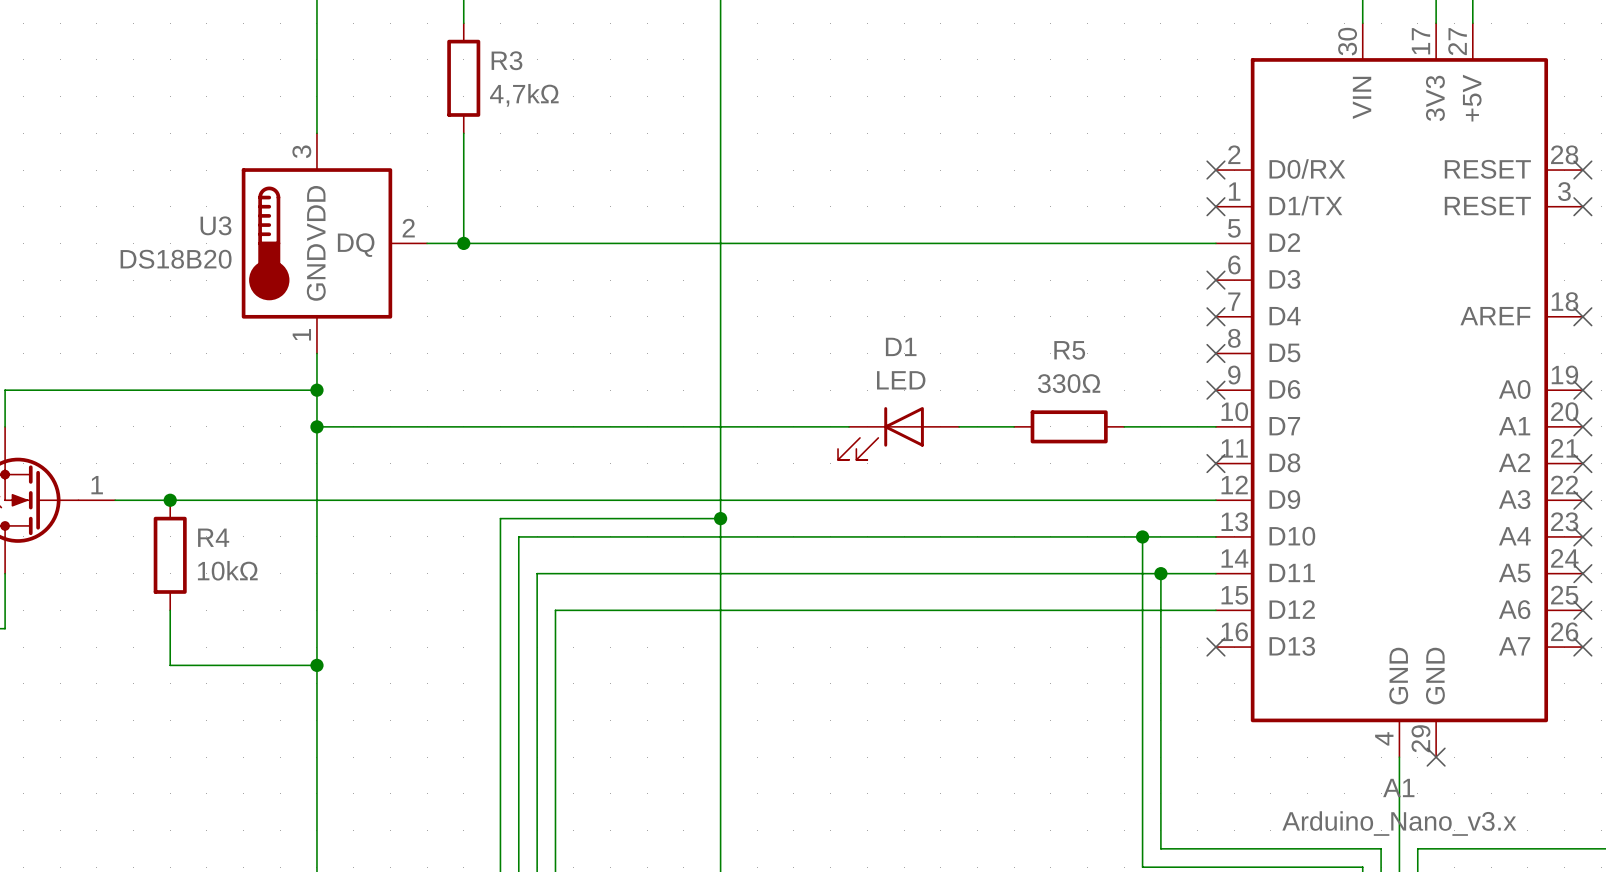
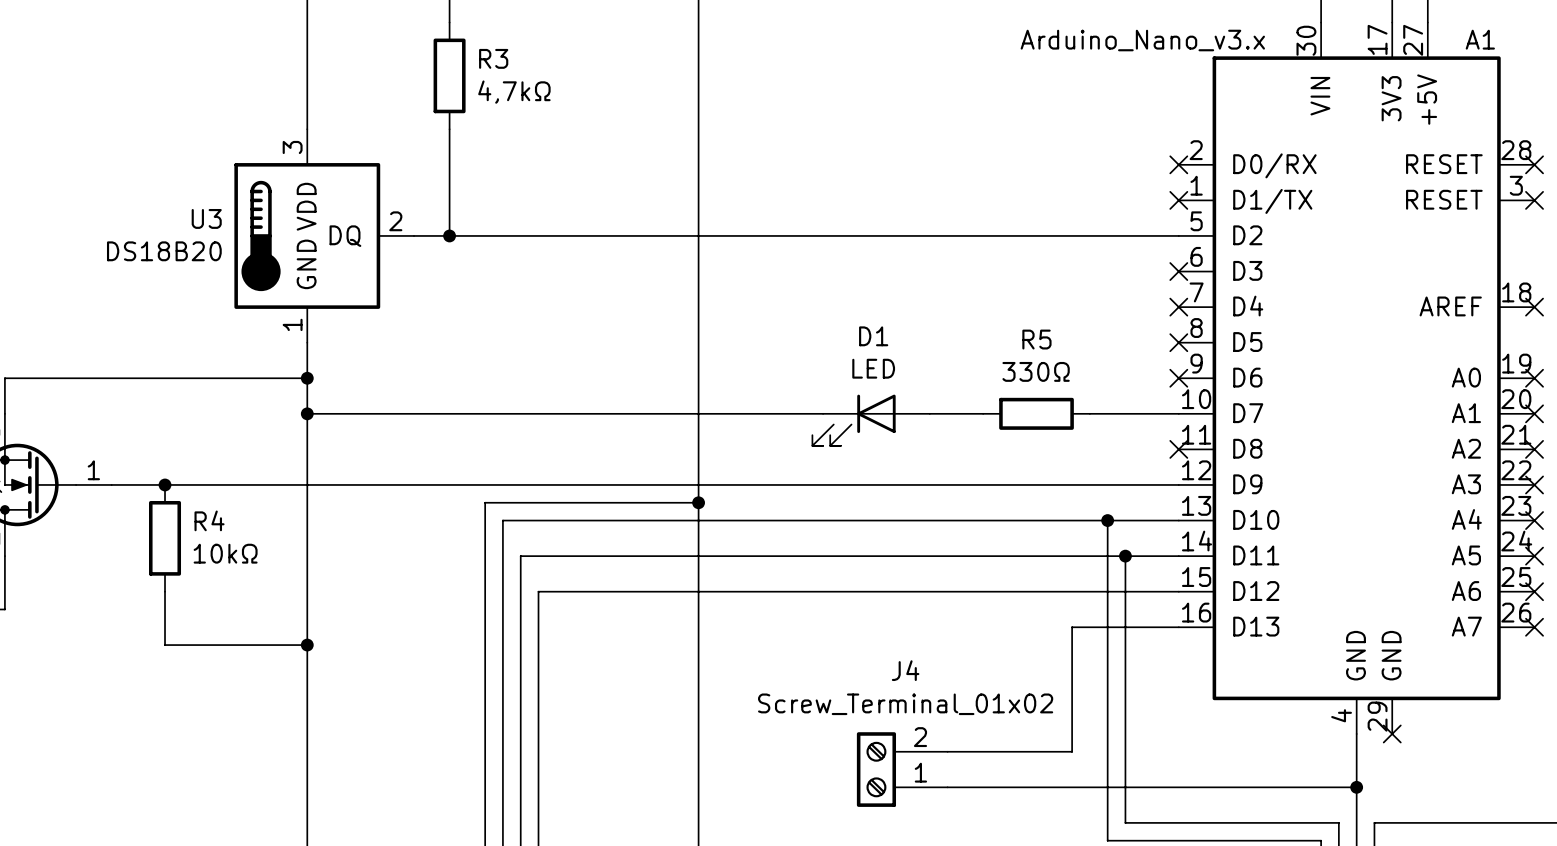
wire: none -> (1178, 627) (1072, 627) (1072, 751) (947, 751)
no-connect mark: (1215, 647) -> none
A1 name position: A1 (1398, 787) -> A1 (1480, 39)
J4: none -> Screw_Terminal_01x02 (902, 769)
wire: none -> (947, 787) (1356, 787)
junction: none -> (1356, 787)
A1 value position: Arduino_Nano_v3.x (1399, 823) -> Arduino_Nano_v3.x (1142, 40)

